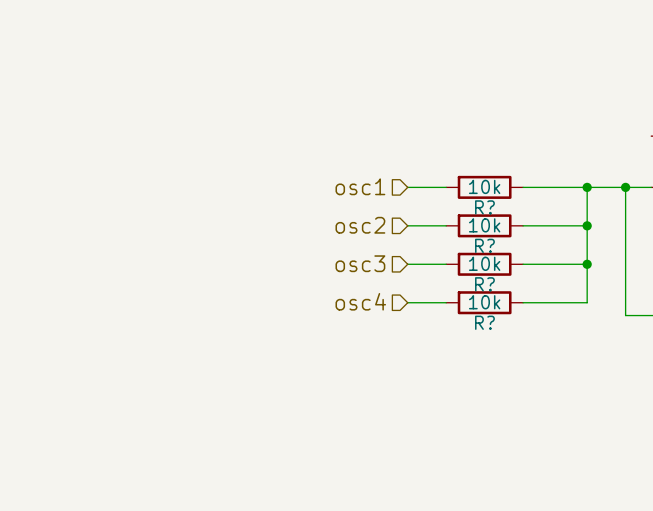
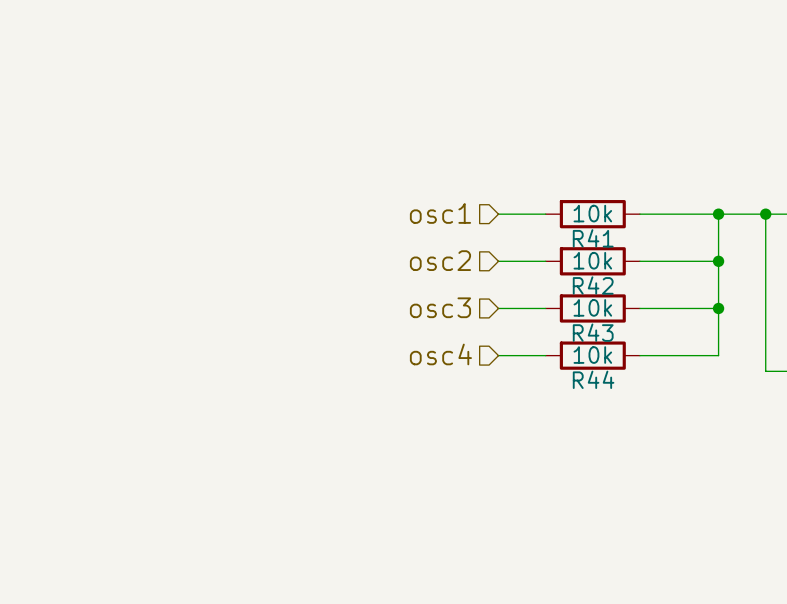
R? name: R? (484, 207) -> R41 (593, 238)
R? name: R? (484, 245) -> R42 (593, 285)
R? name: R? (484, 284) -> R43 (593, 332)
R? name: R? (484, 322) -> R44 (593, 379)

